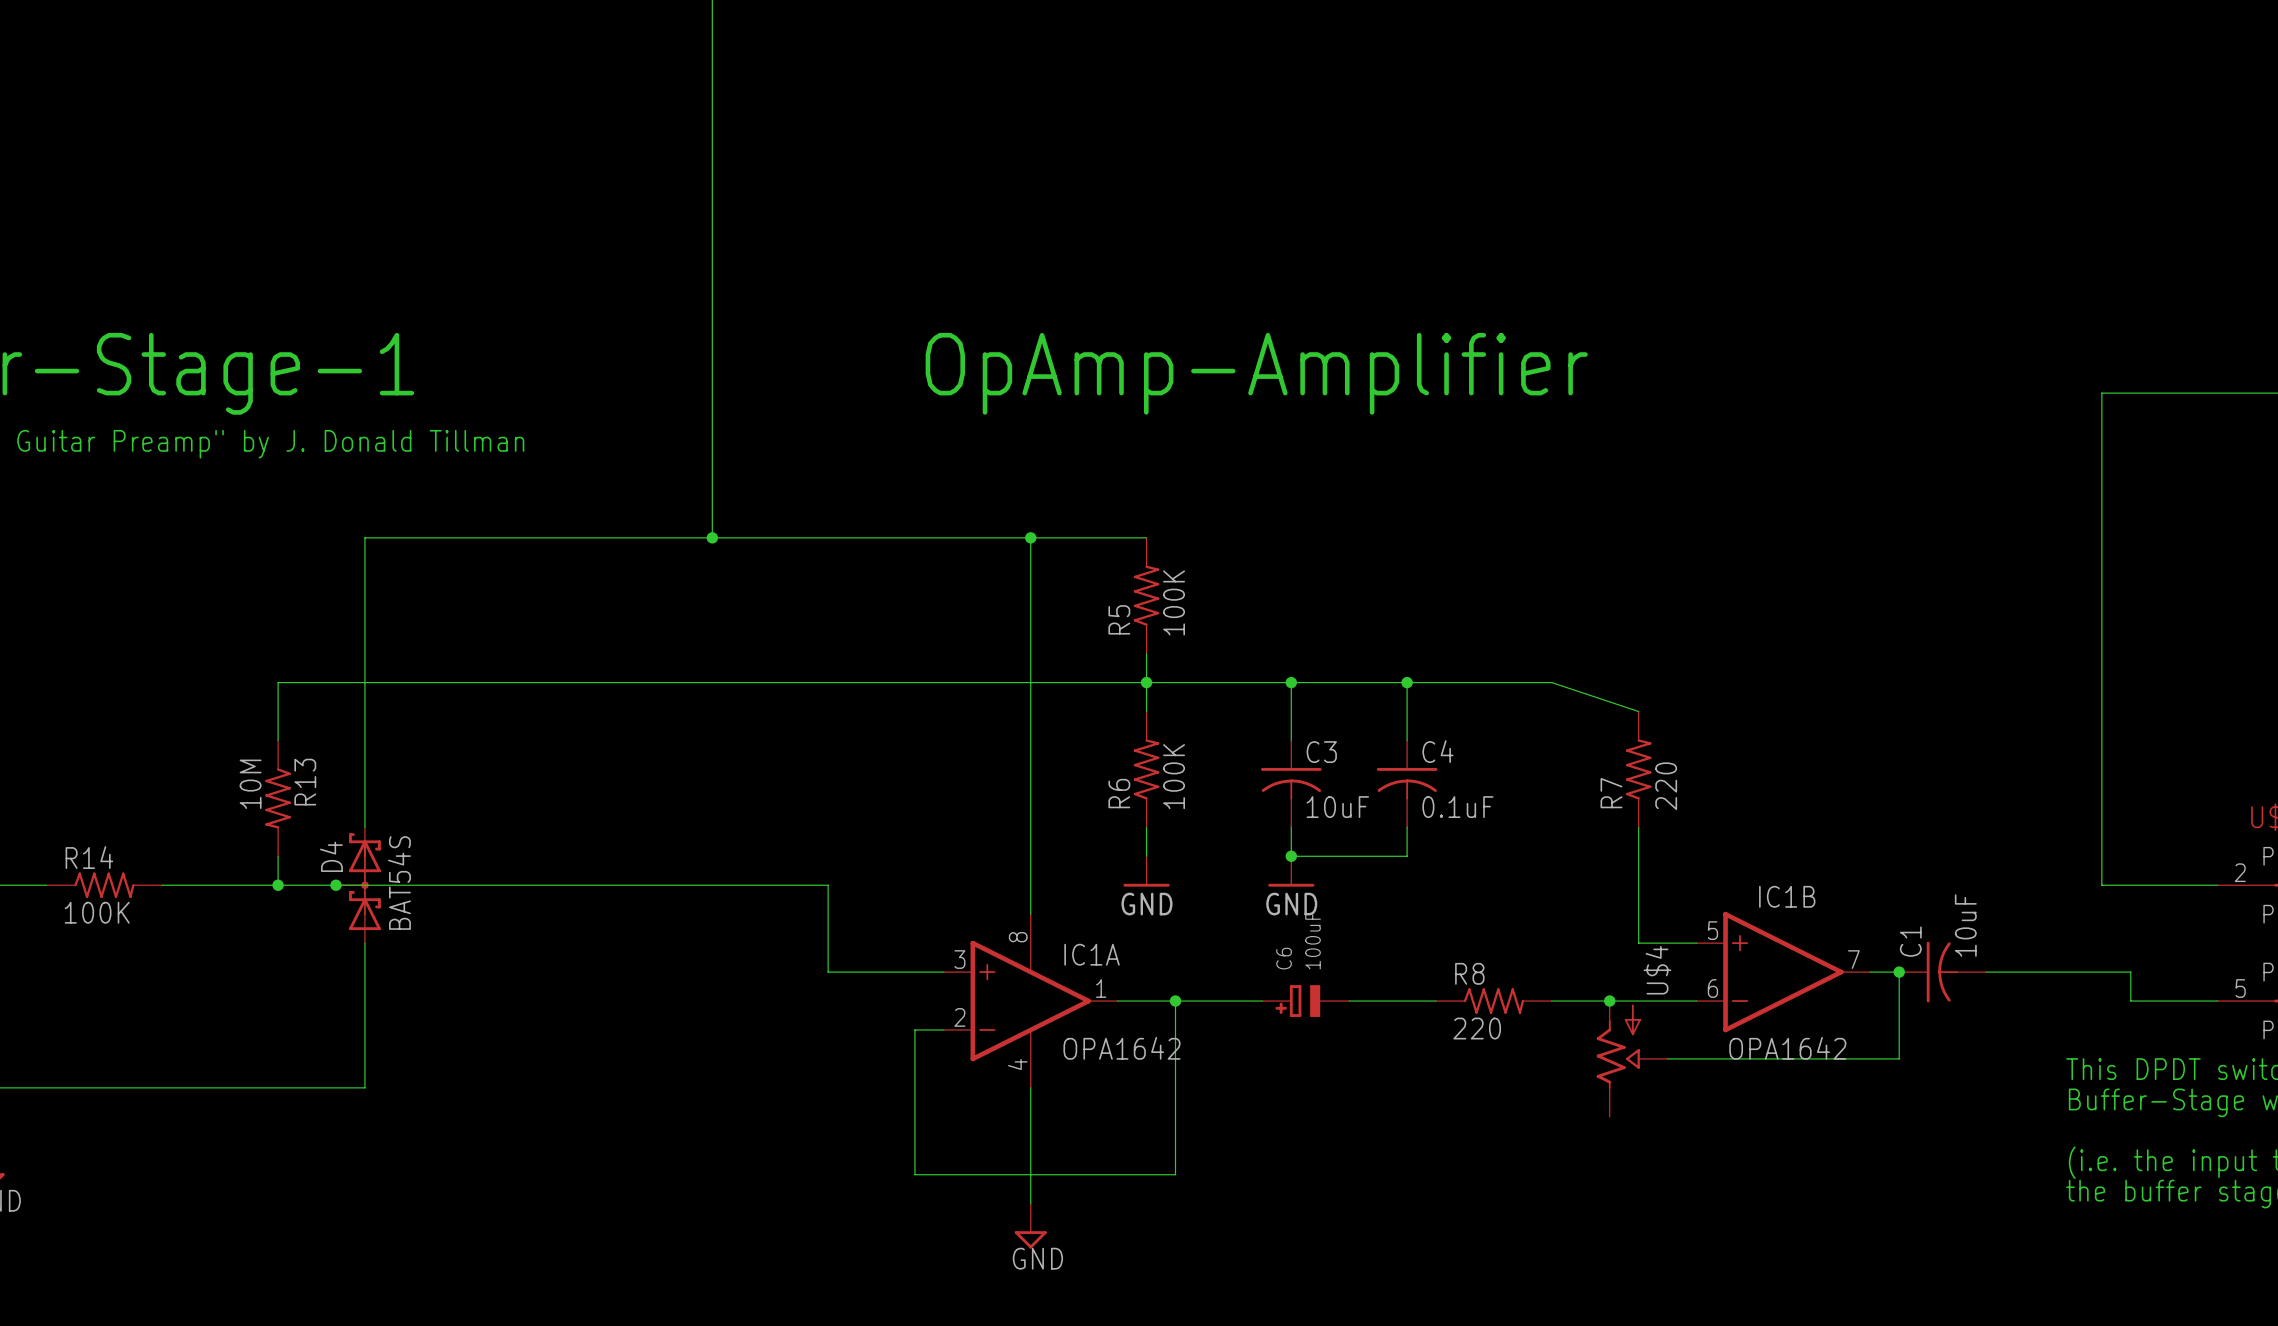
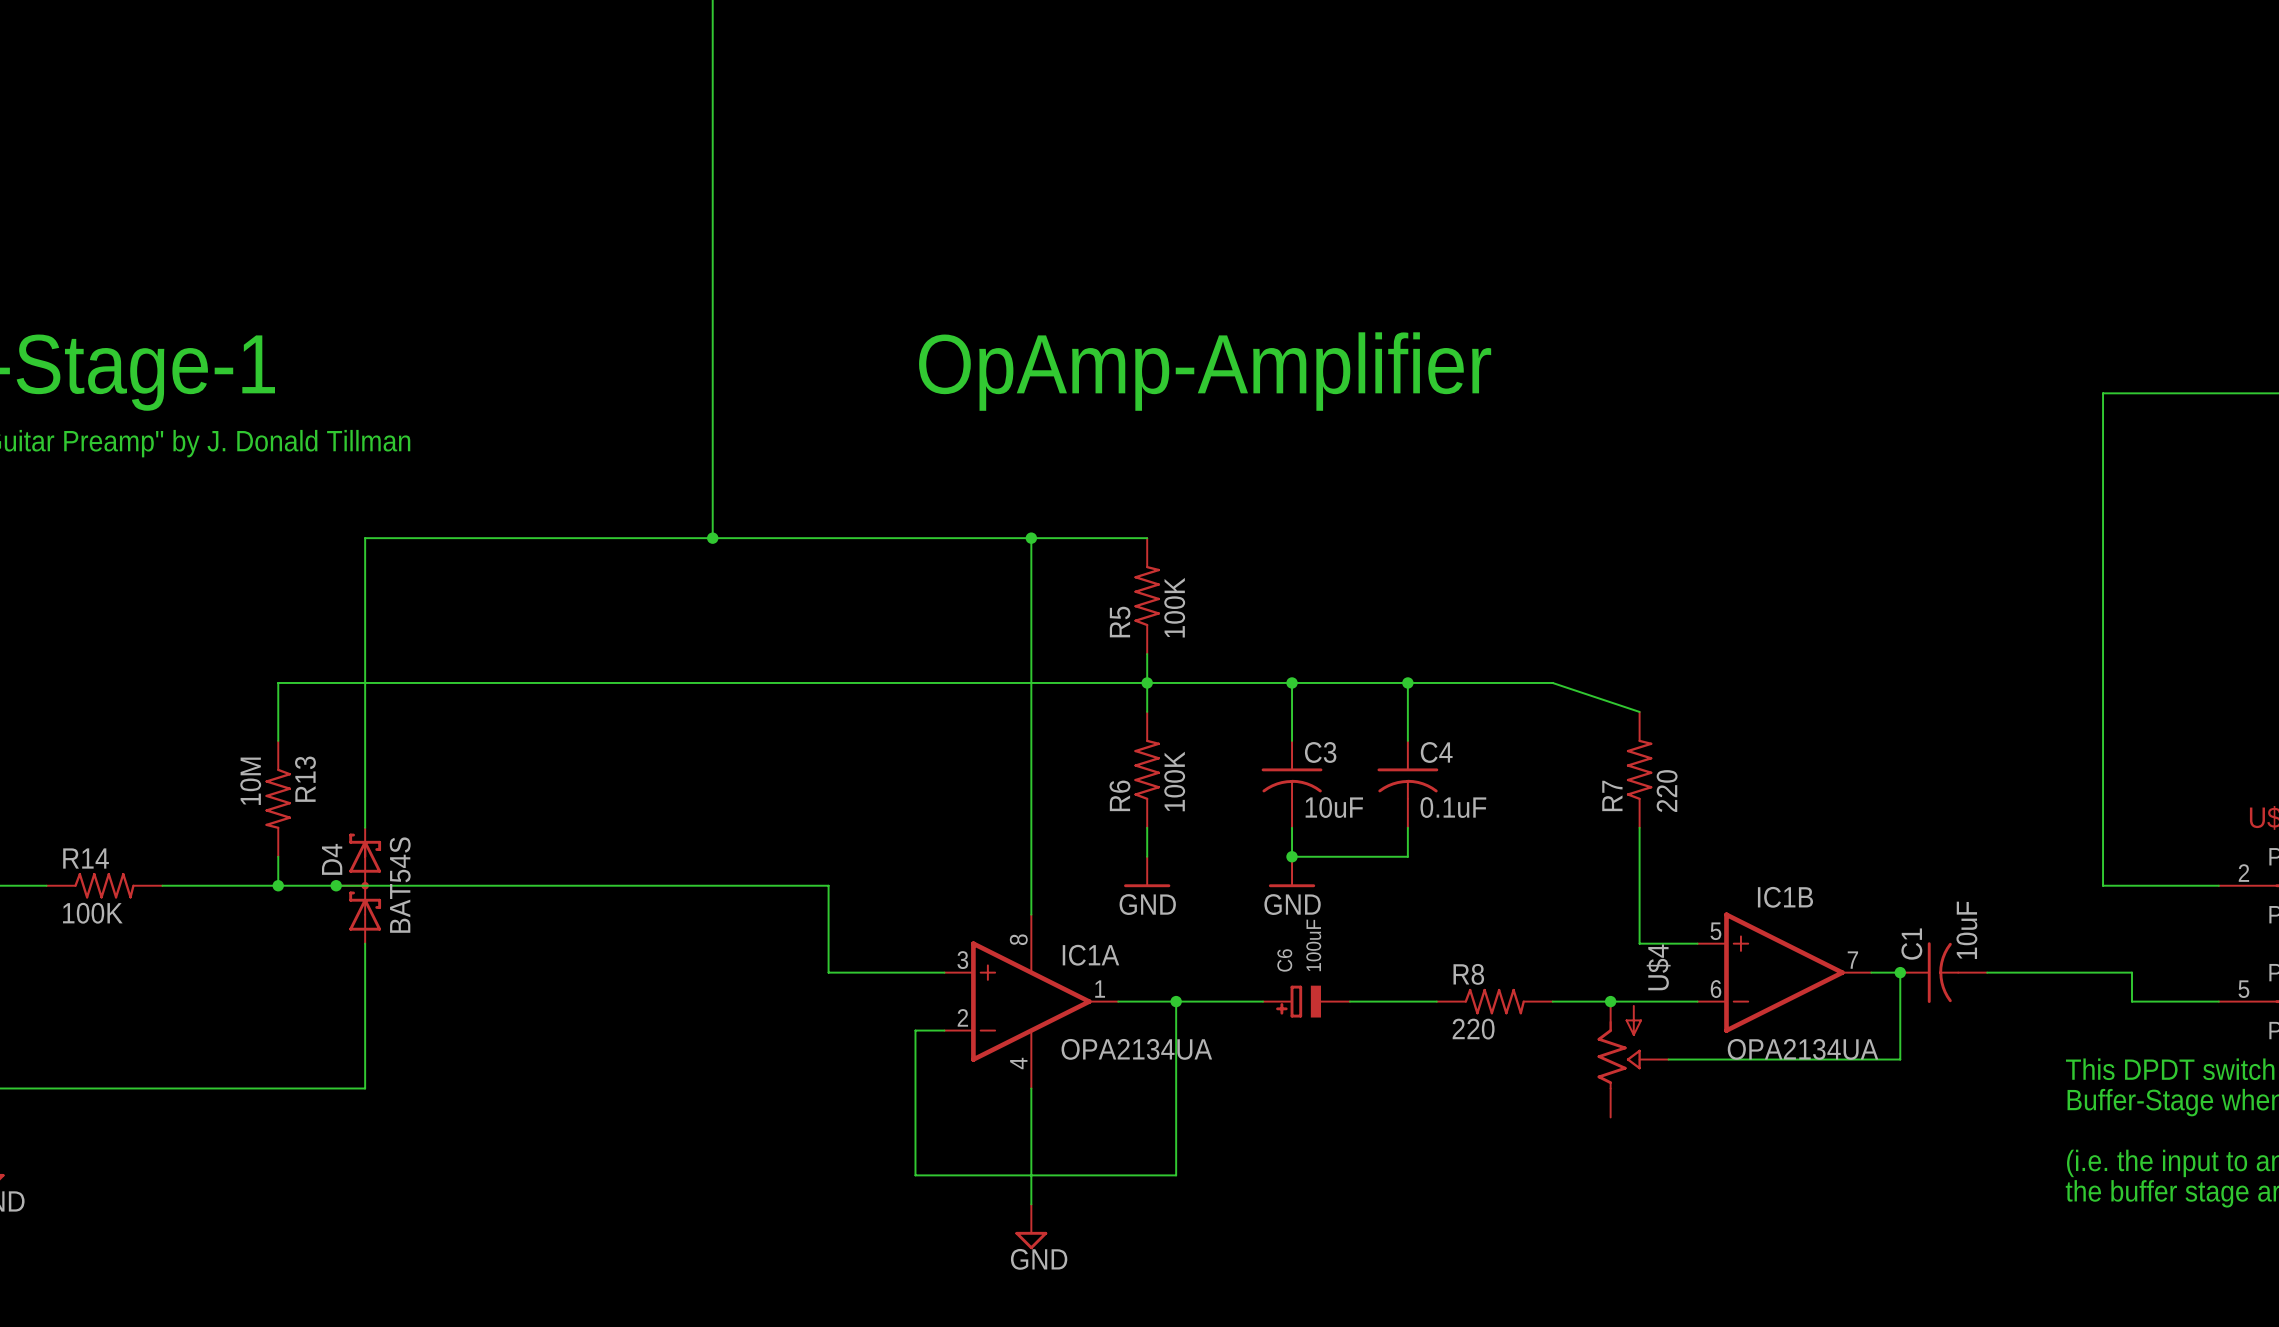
IC1A value: OPA1642 (1122, 1048) -> OPA2134UA (1136, 1049)
IC1B value: OPA1642 (1787, 1048) -> OPA2134UA (1803, 1049)

